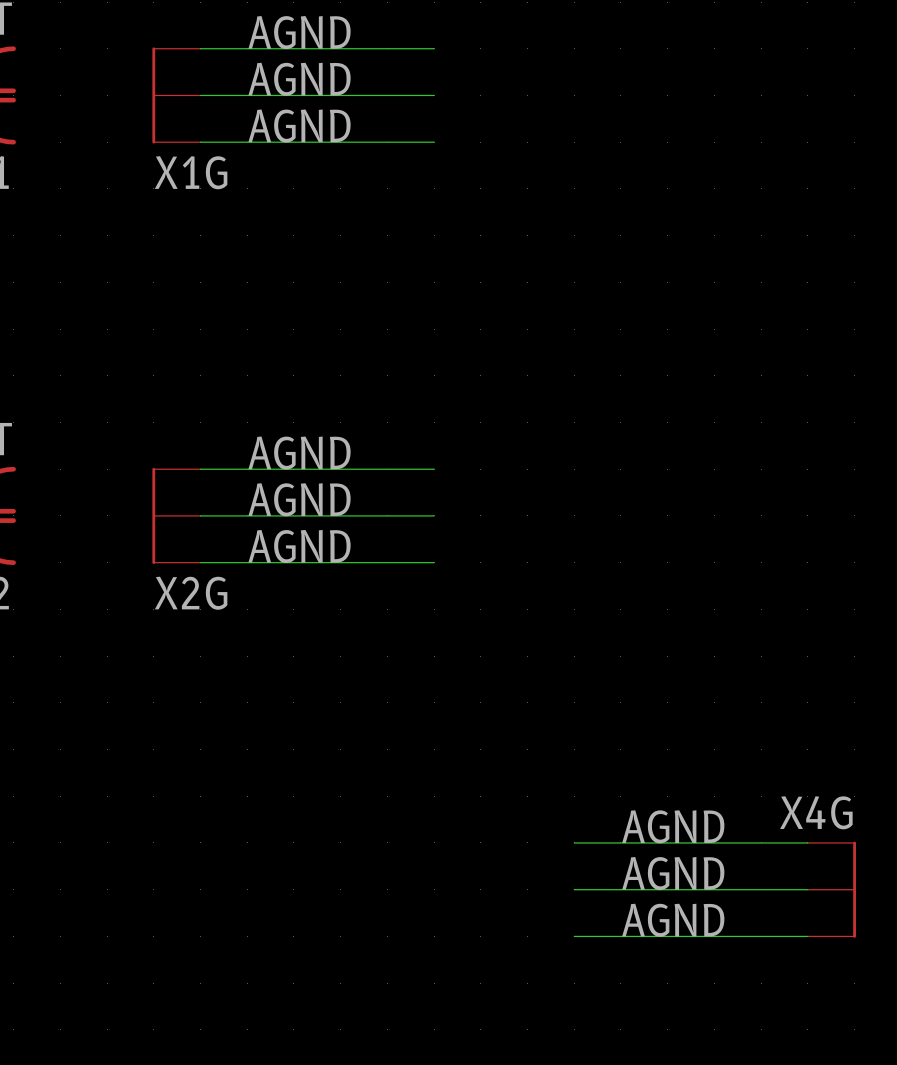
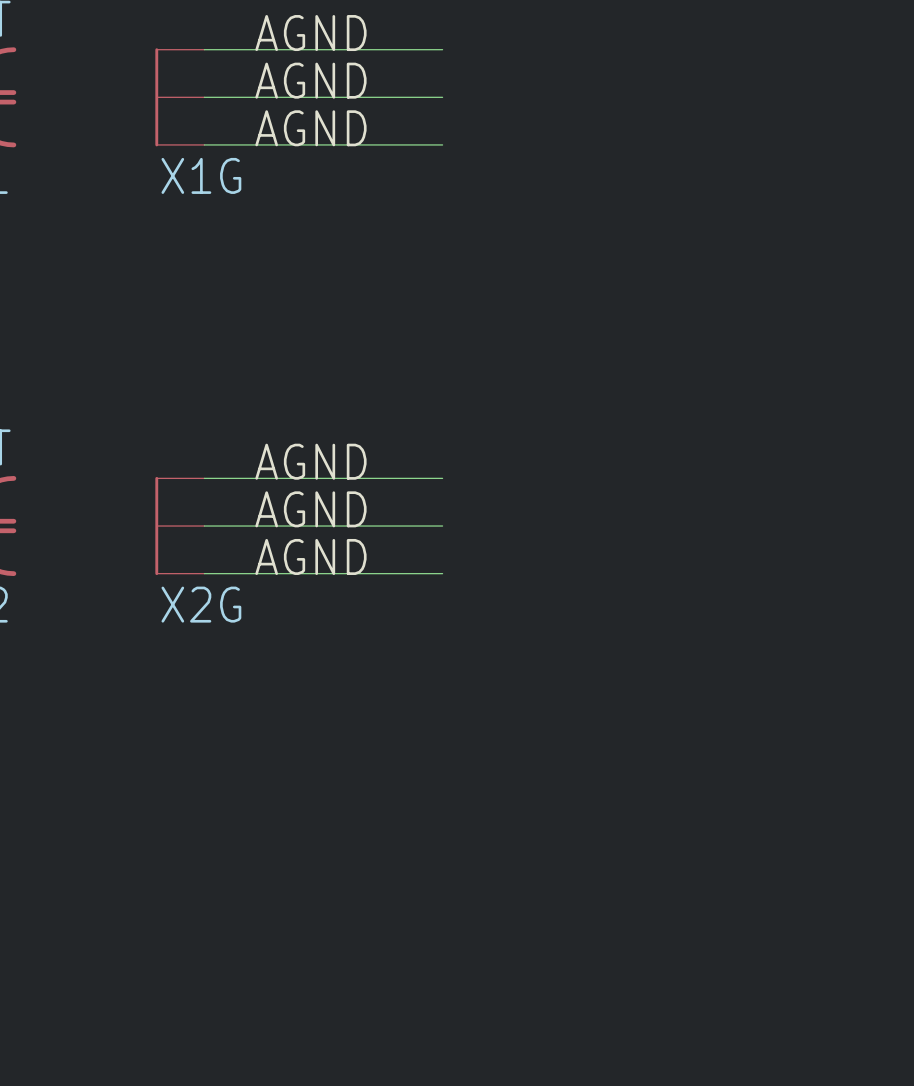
label: AGND (673, 826) -> none
wire: (574, 842) (807, 842) -> none
label: AGND (673, 873) -> none
wire: (574, 889) (807, 889) -> none
X4G: (831, 889) -> none
label: AGND (673, 920) -> none
wire: (574, 936) (807, 936) -> none

